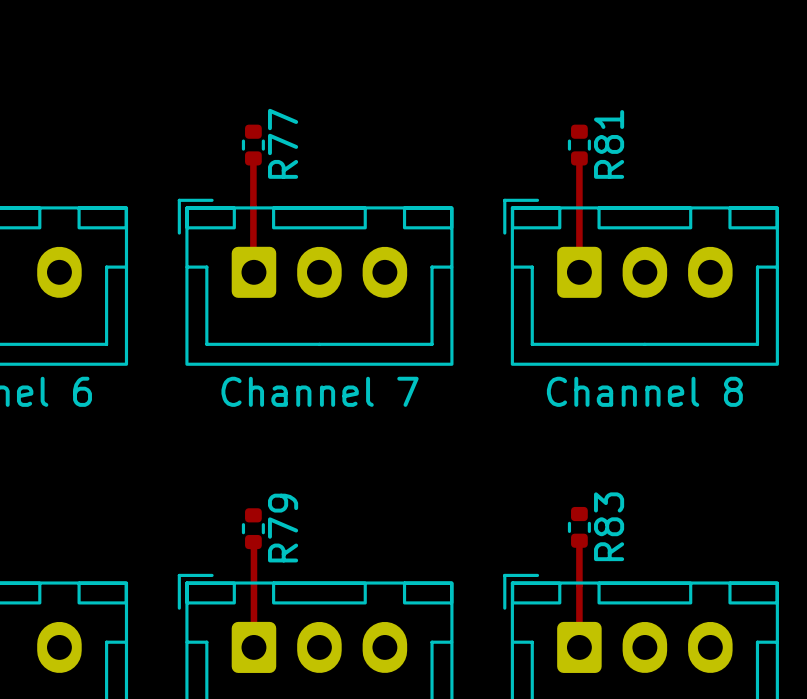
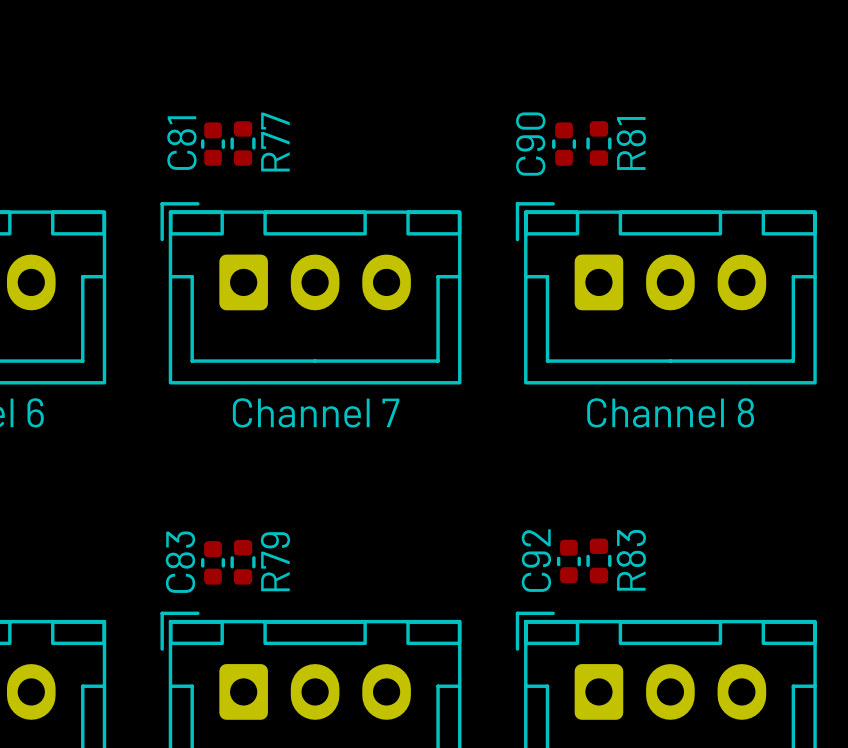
C81: none -> (213, 144)
C90: none -> (564, 144)
track: (253, 158) (253, 272) -> none
track: (579, 158) (579, 272) -> none
C92: none -> (568, 561)
C83: none -> (213, 562)
track: (579, 540) (579, 647) -> none
track: (253, 542) (253, 647) -> none

